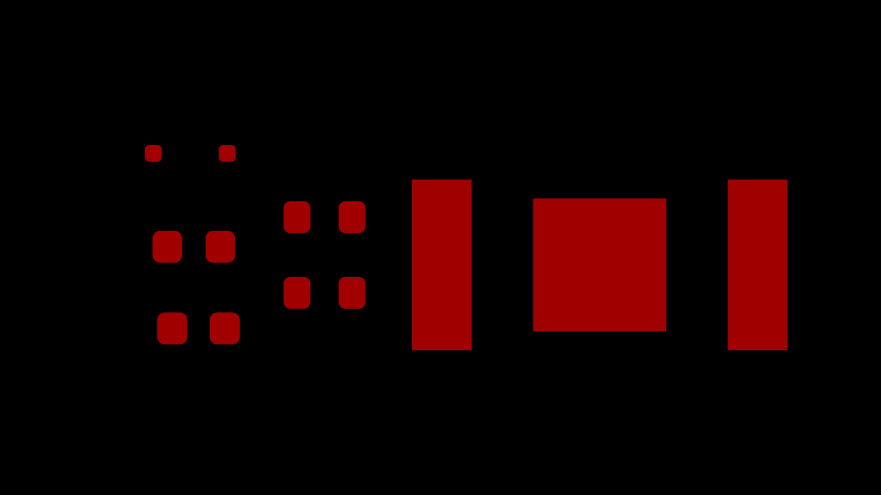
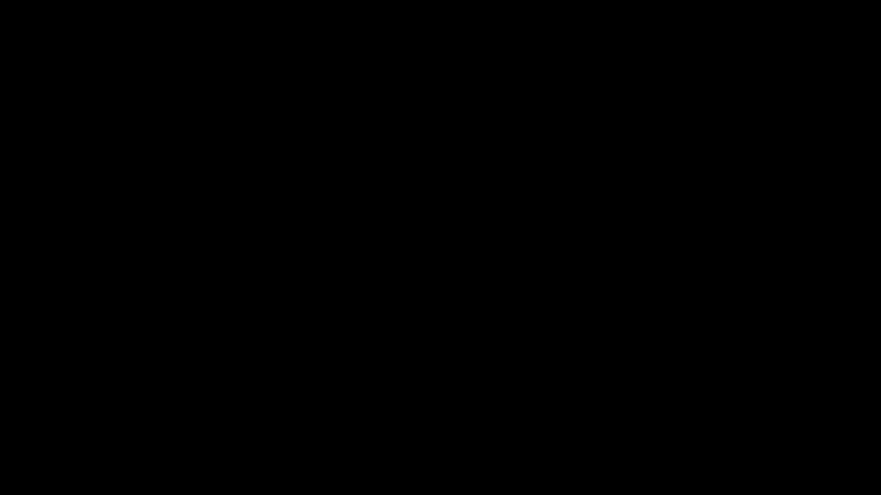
part: (190, 153) -> none
part: (324, 217) -> none
part: (193, 246) -> none
part: (599, 264) -> none
part: (324, 292) -> none
part: (198, 328) -> none

